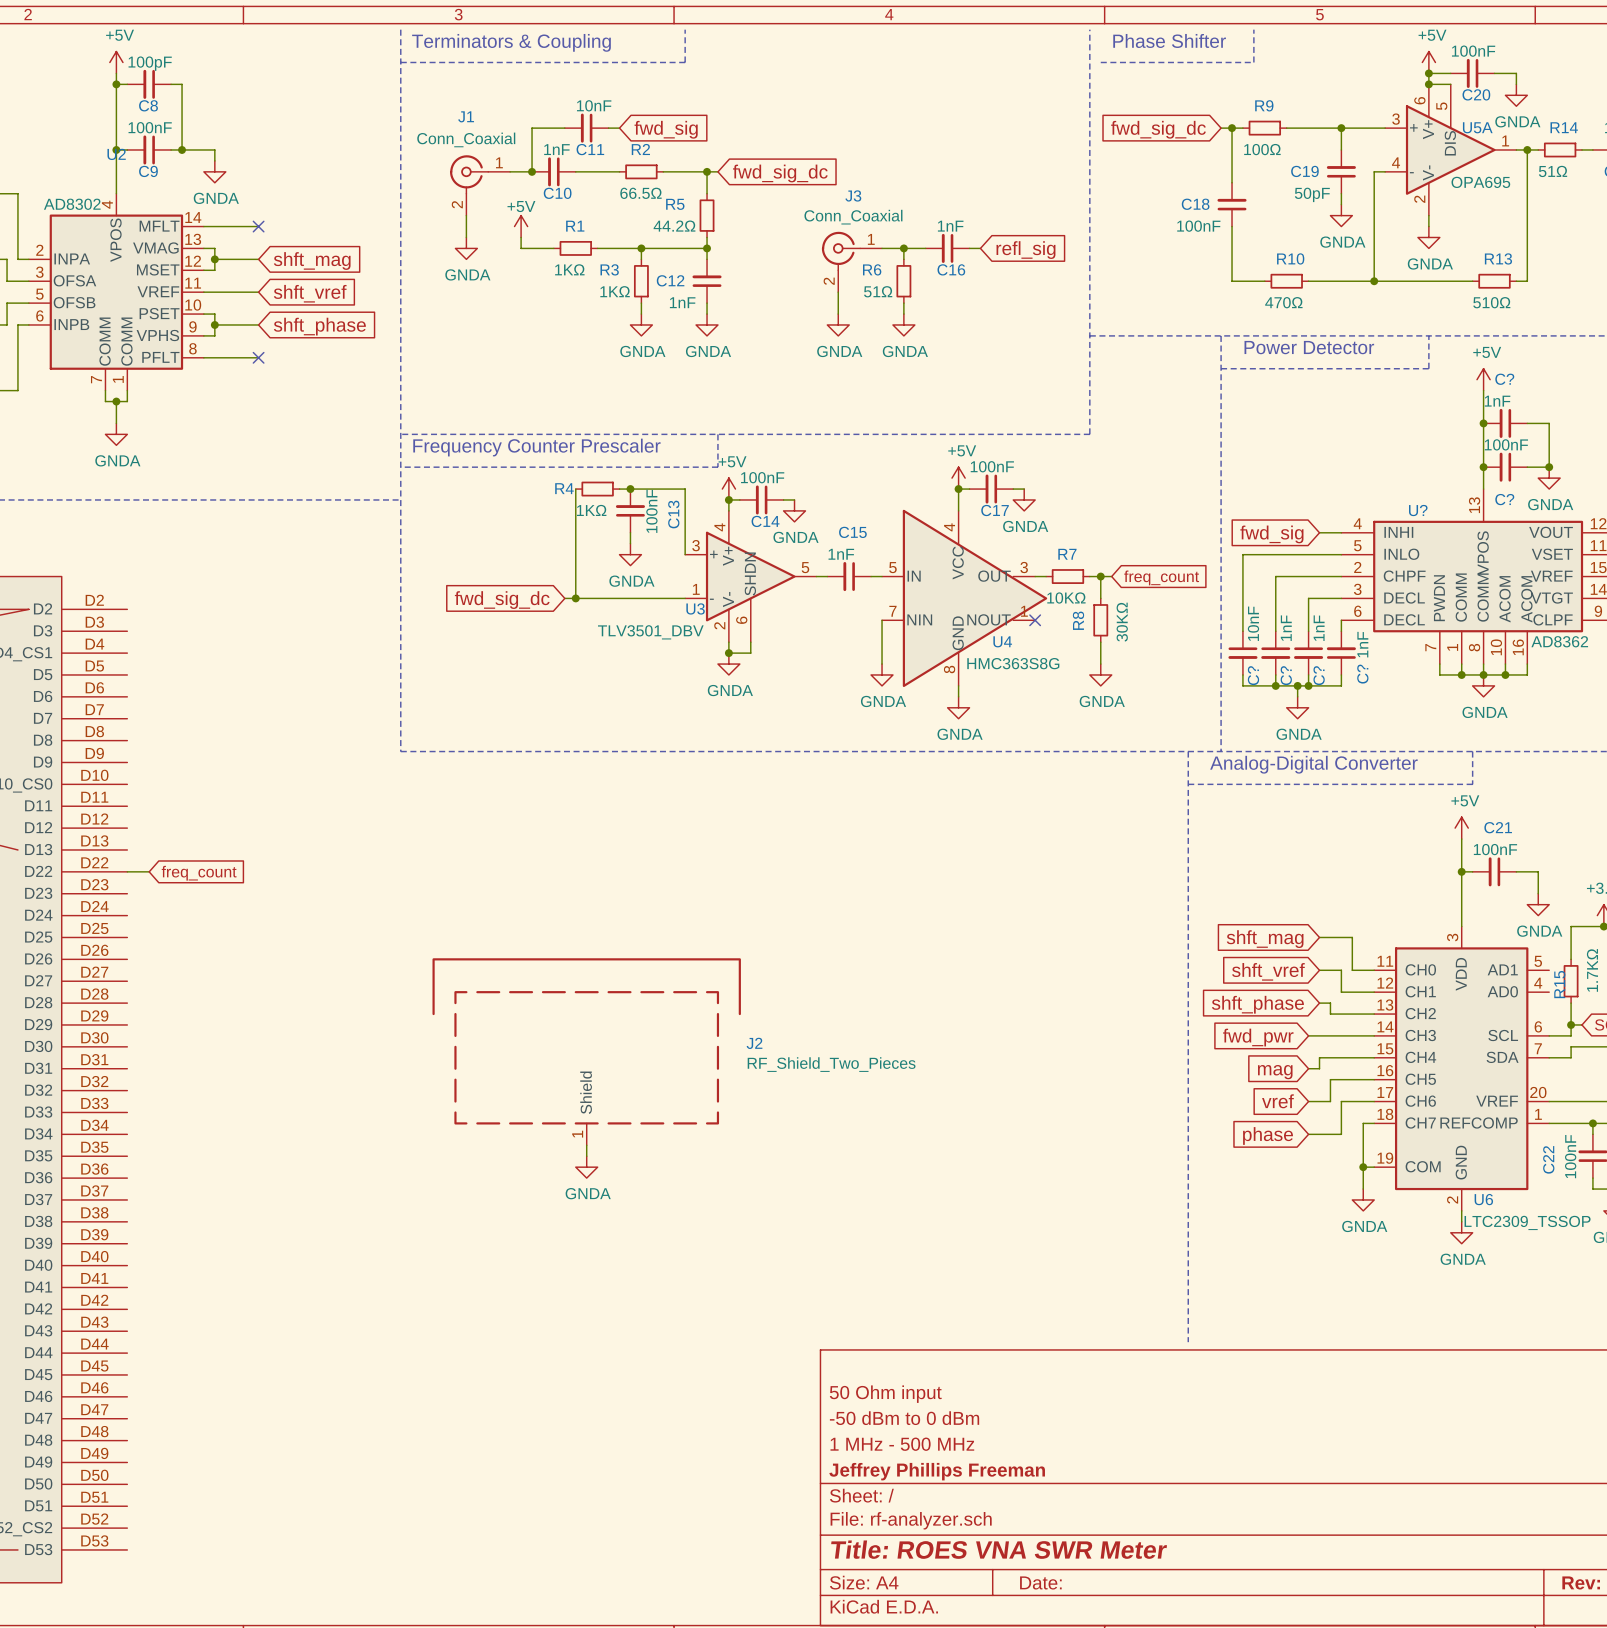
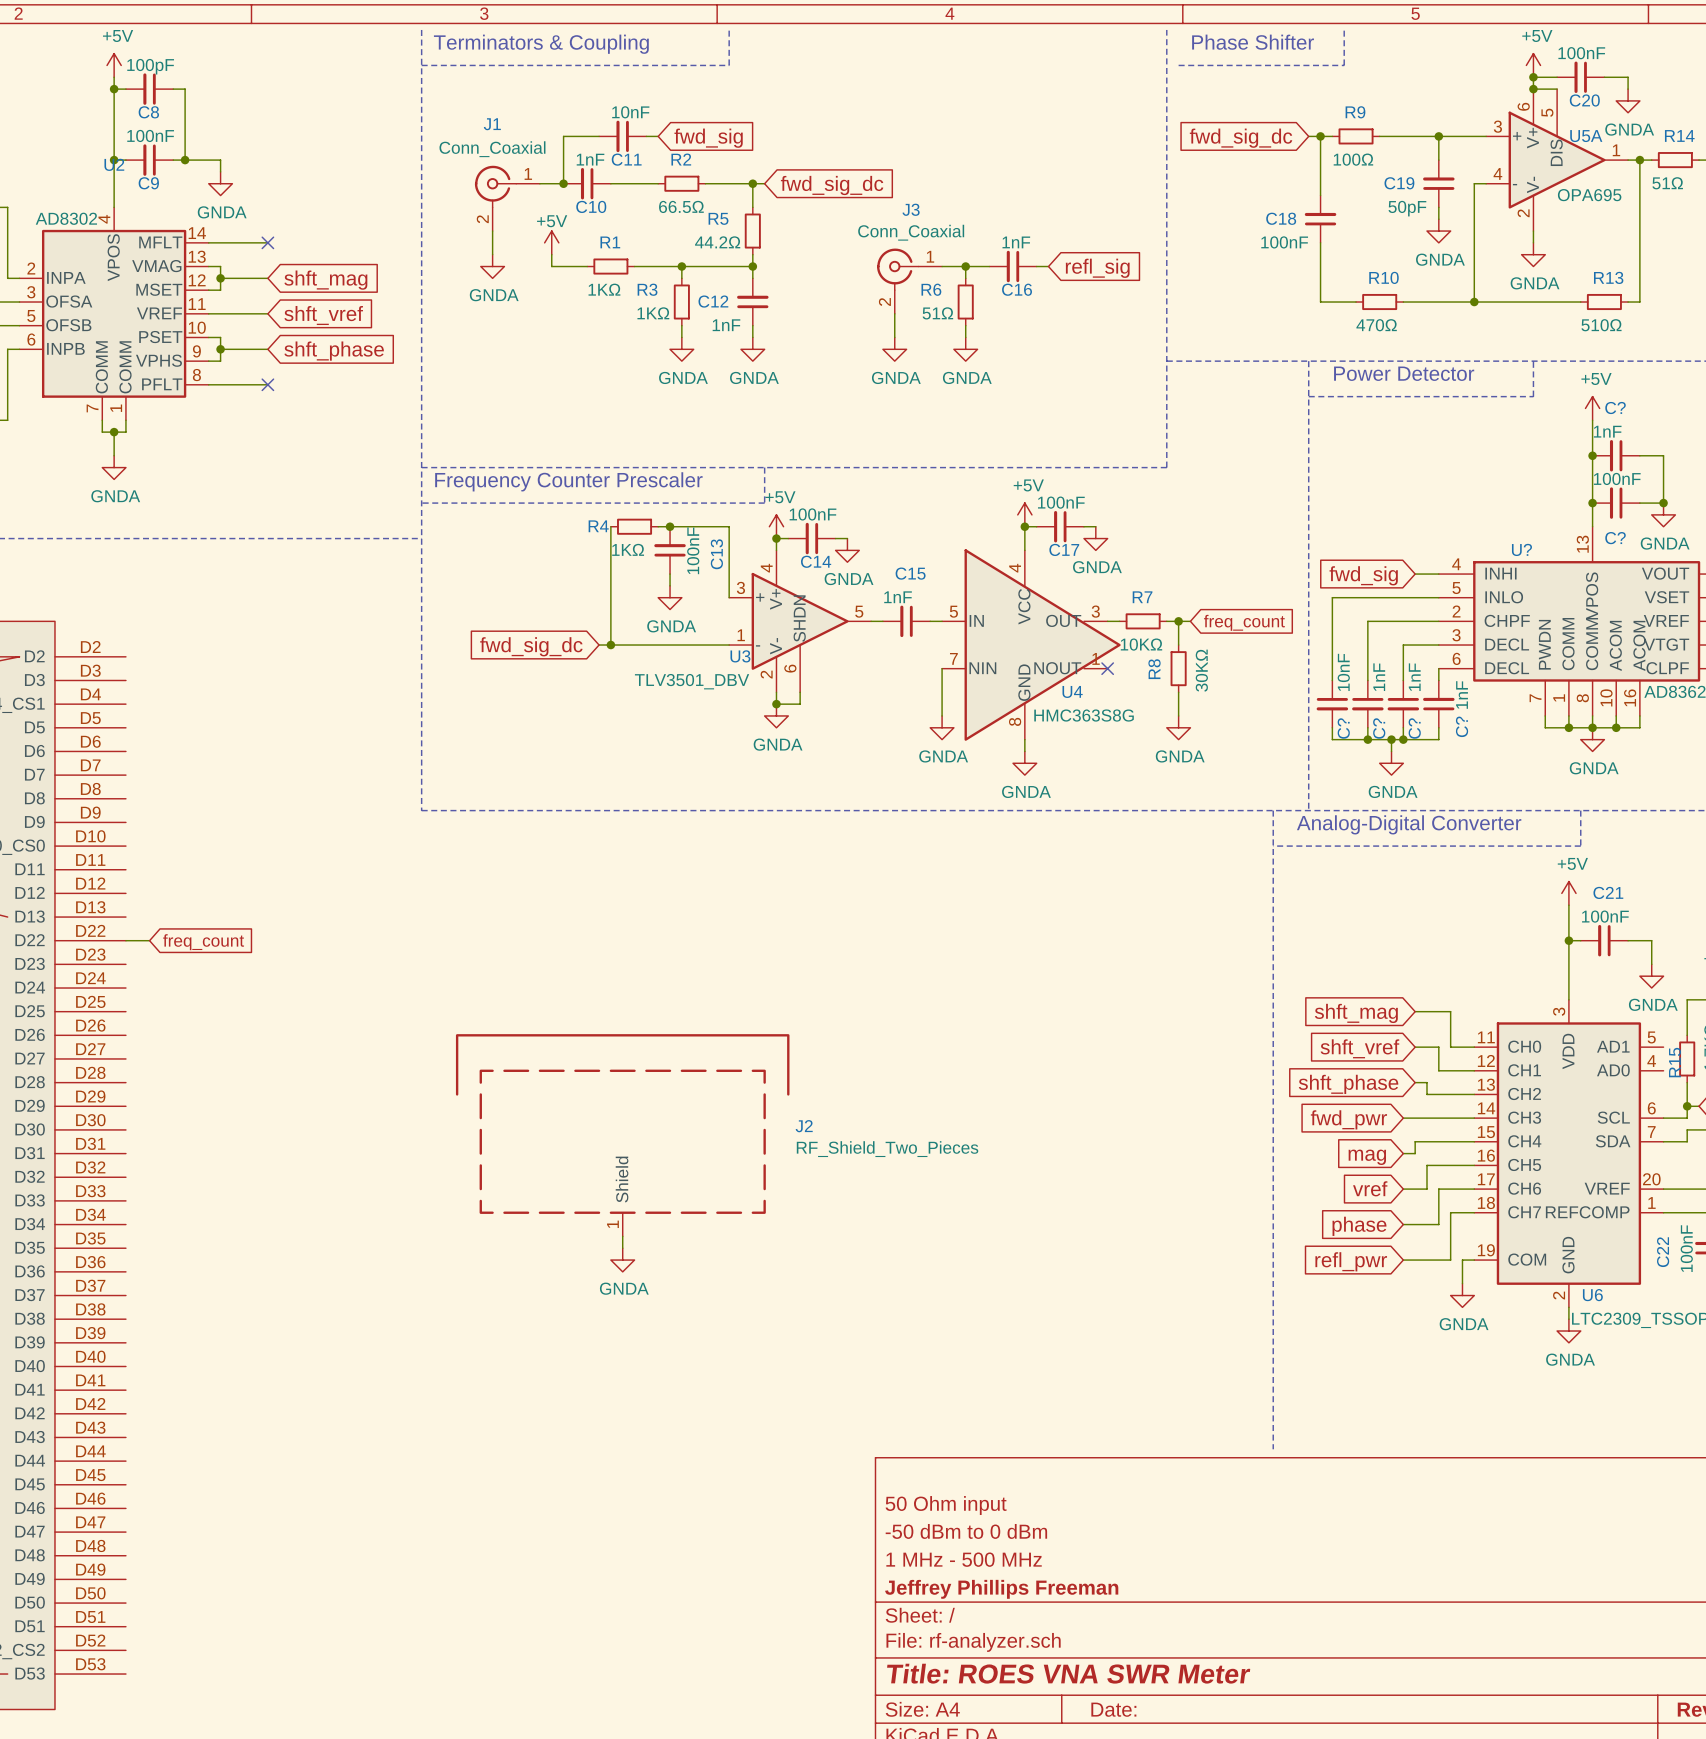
wire: (1363, 1123) (1363, 1167) -> (1462, 1212) (1450, 1212) (1450, 1260) (1403, 1260)
junction: (1363, 1167) -> none
global label: none -> refl_pwr (1351, 1261)

